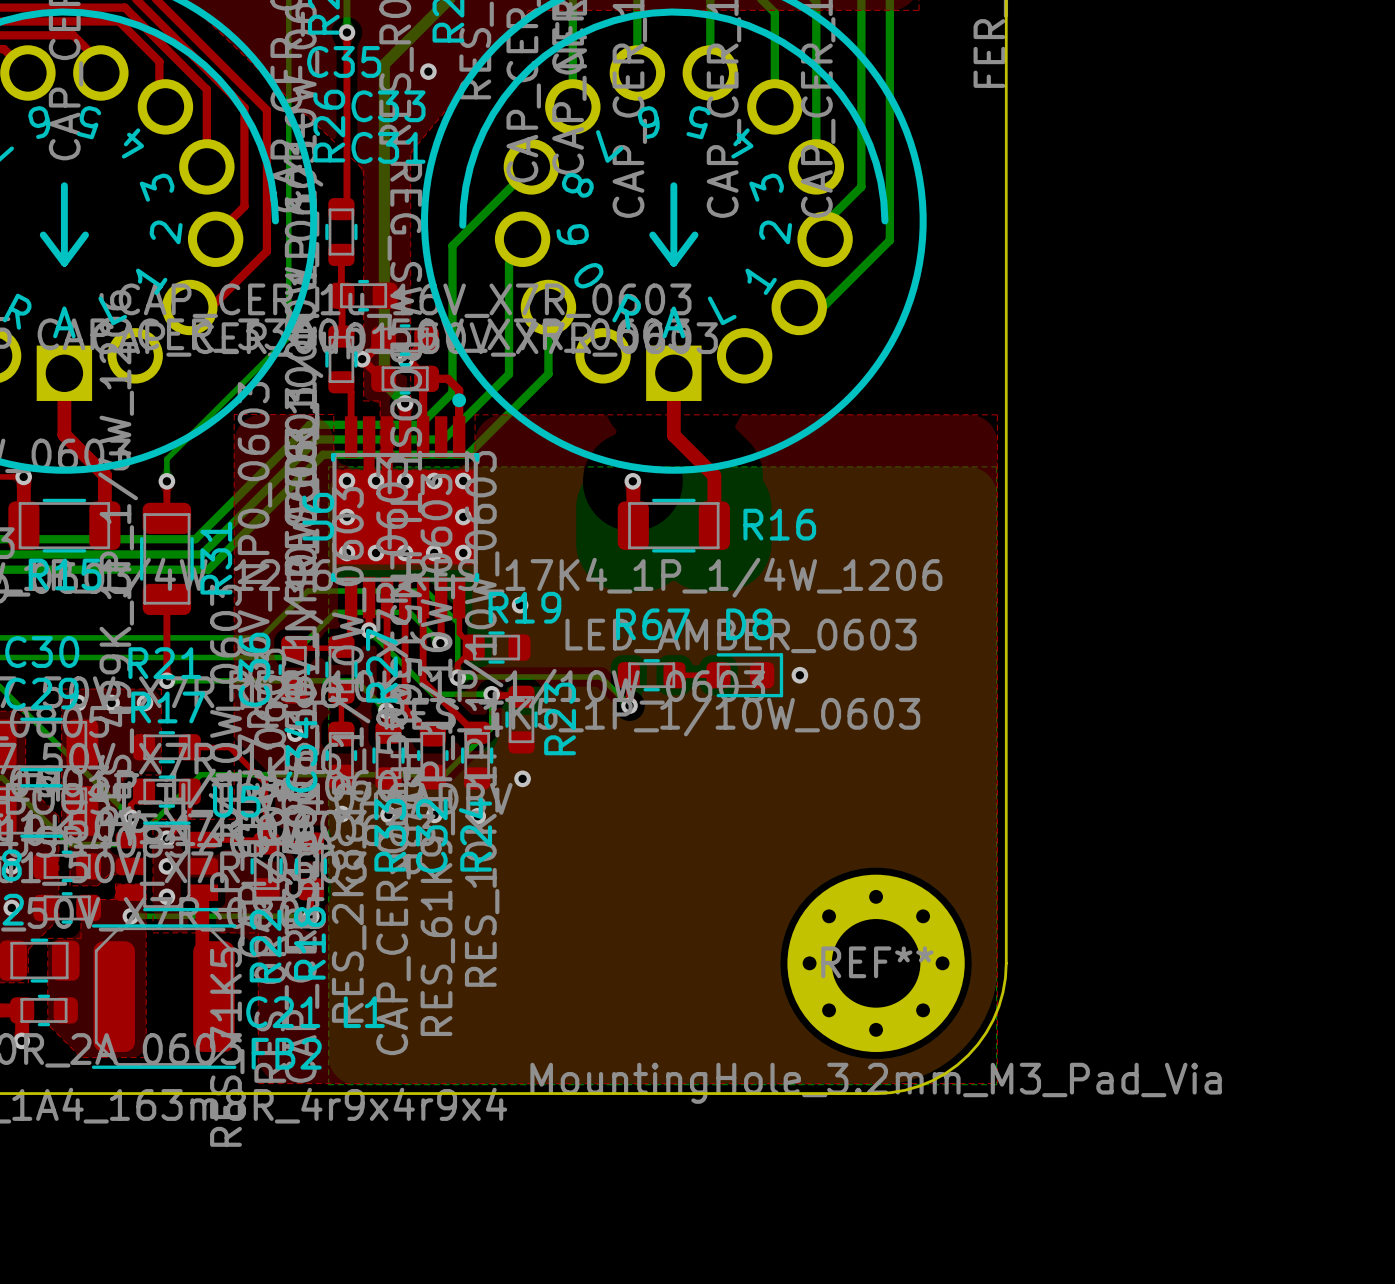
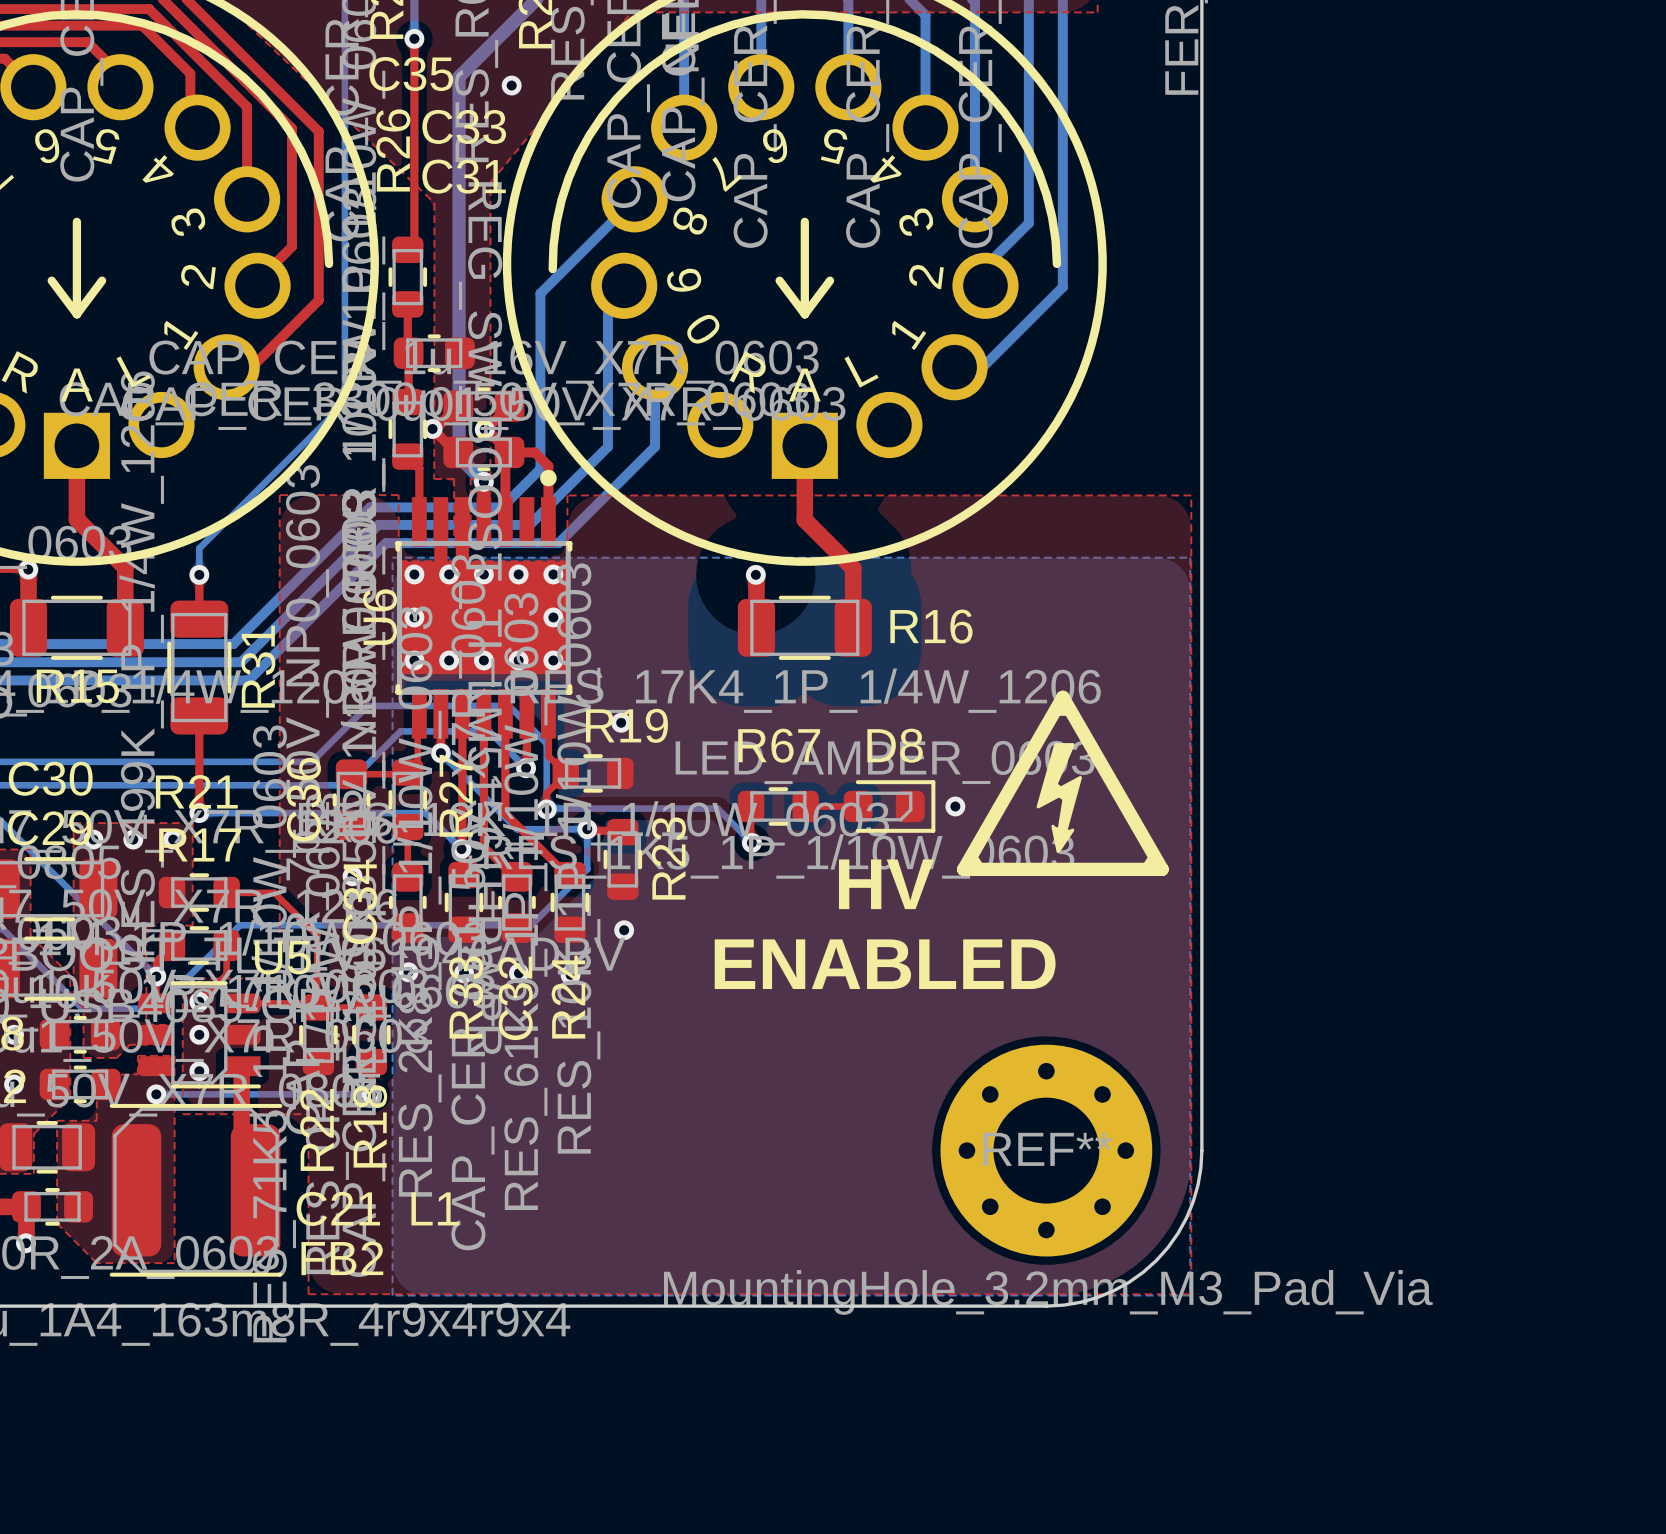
drawing: none -> [957, 690, 1169, 876]
text: none -> HV (886, 884)
text: none -> ENABLED (885, 964)

